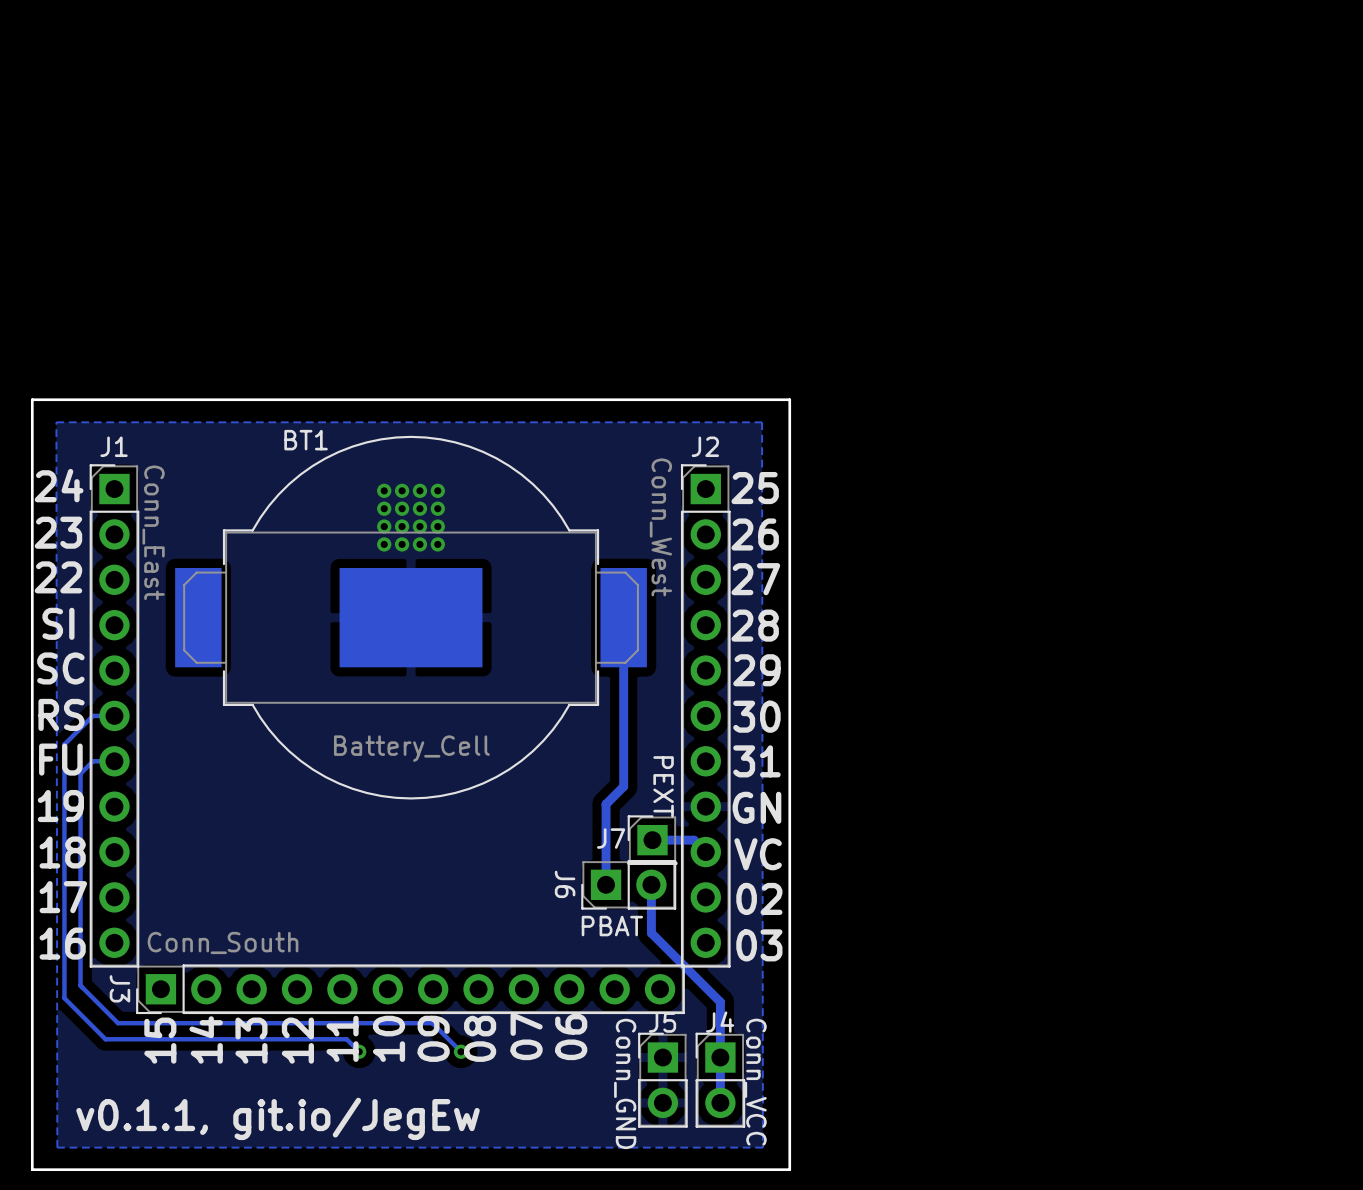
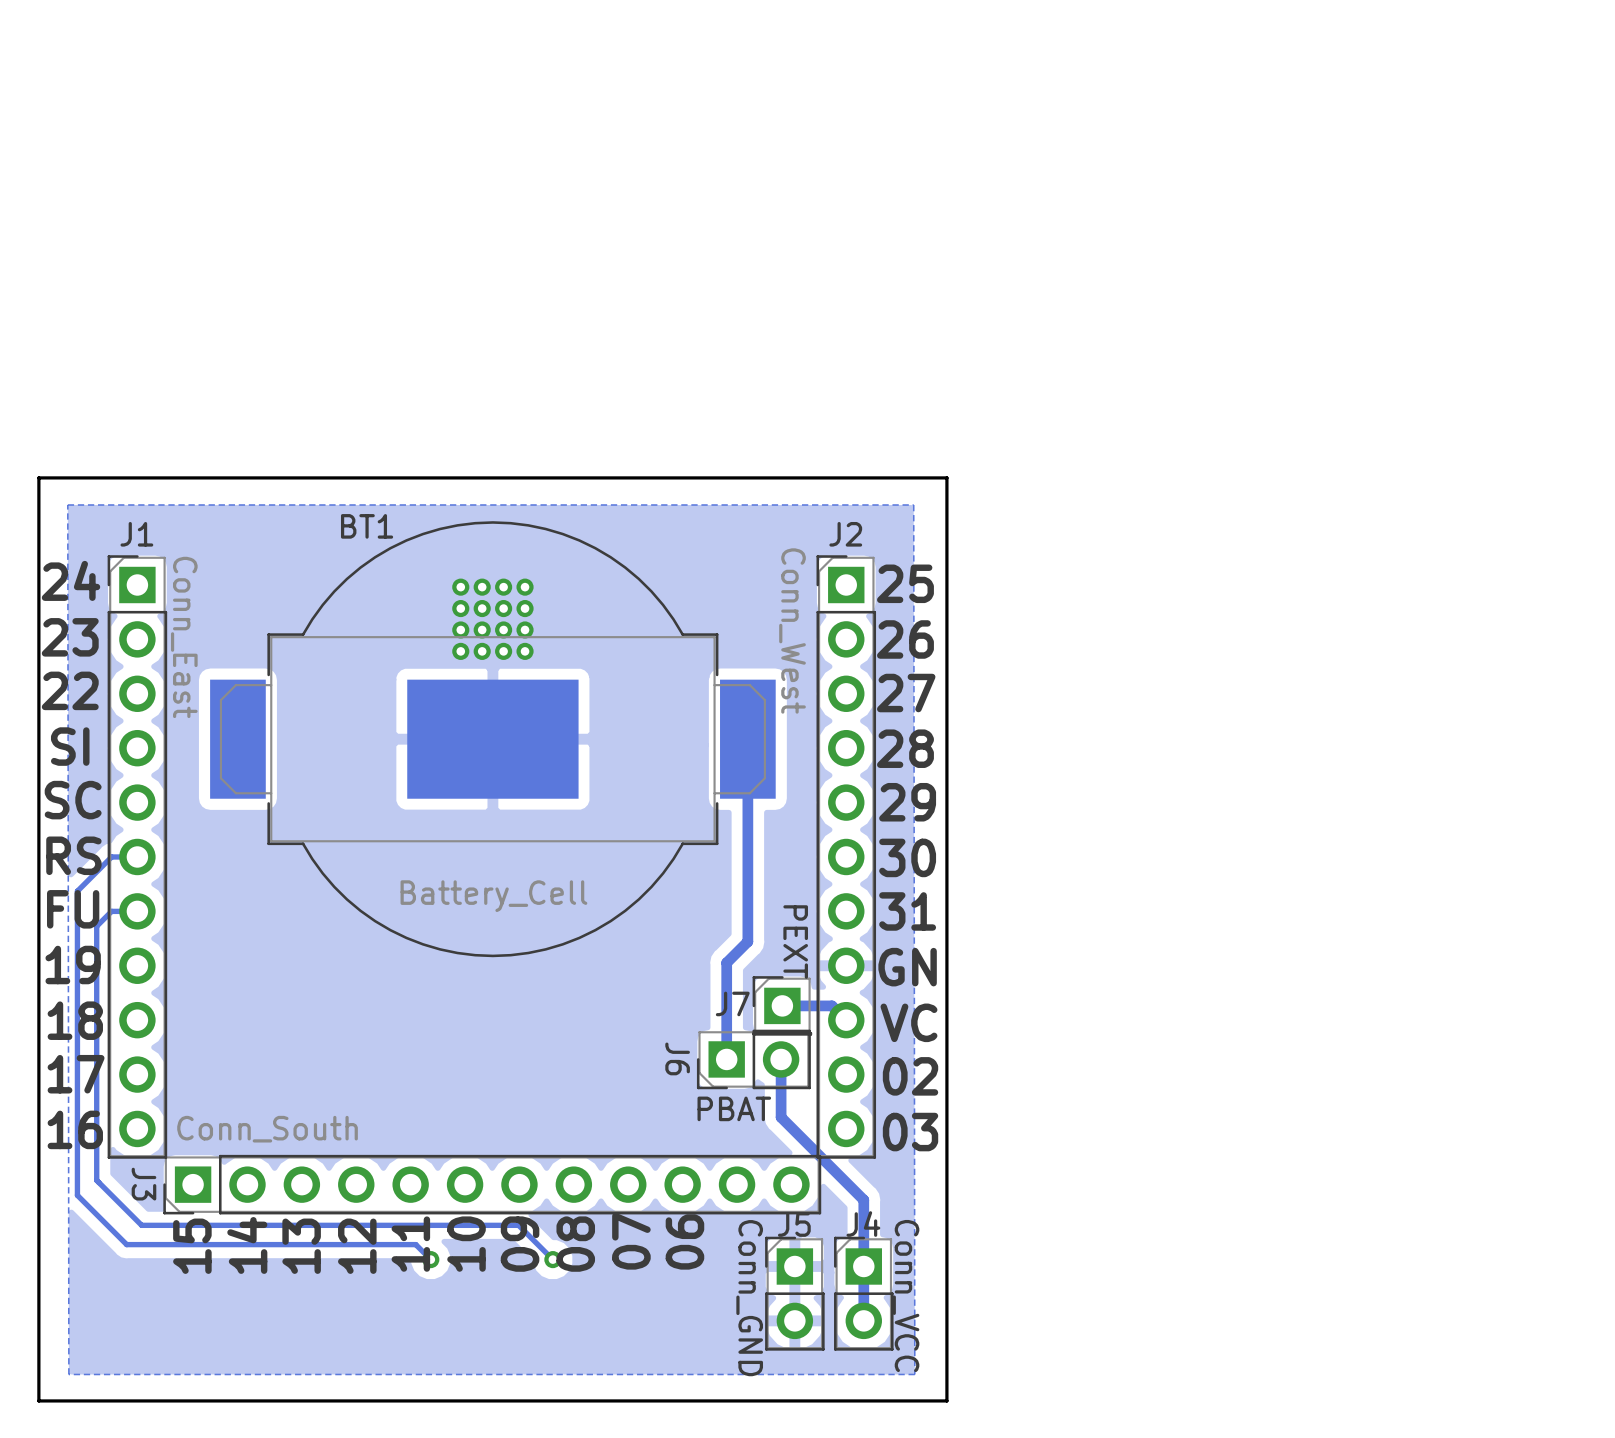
text: v0.1.1, git.io/JegEw (278, 1118) -> none

